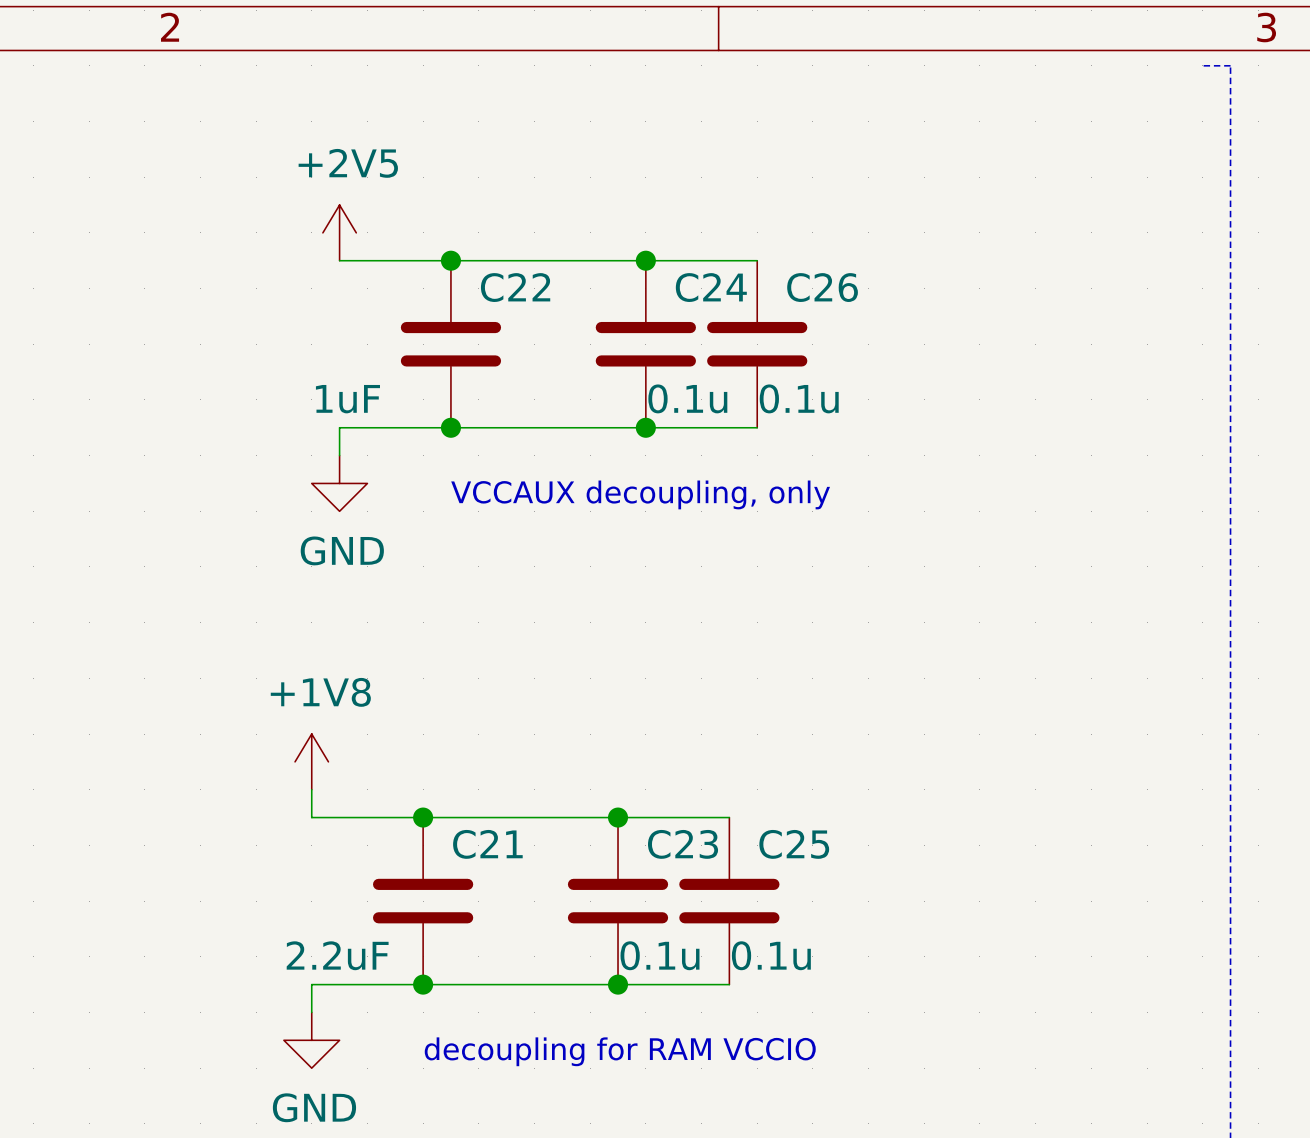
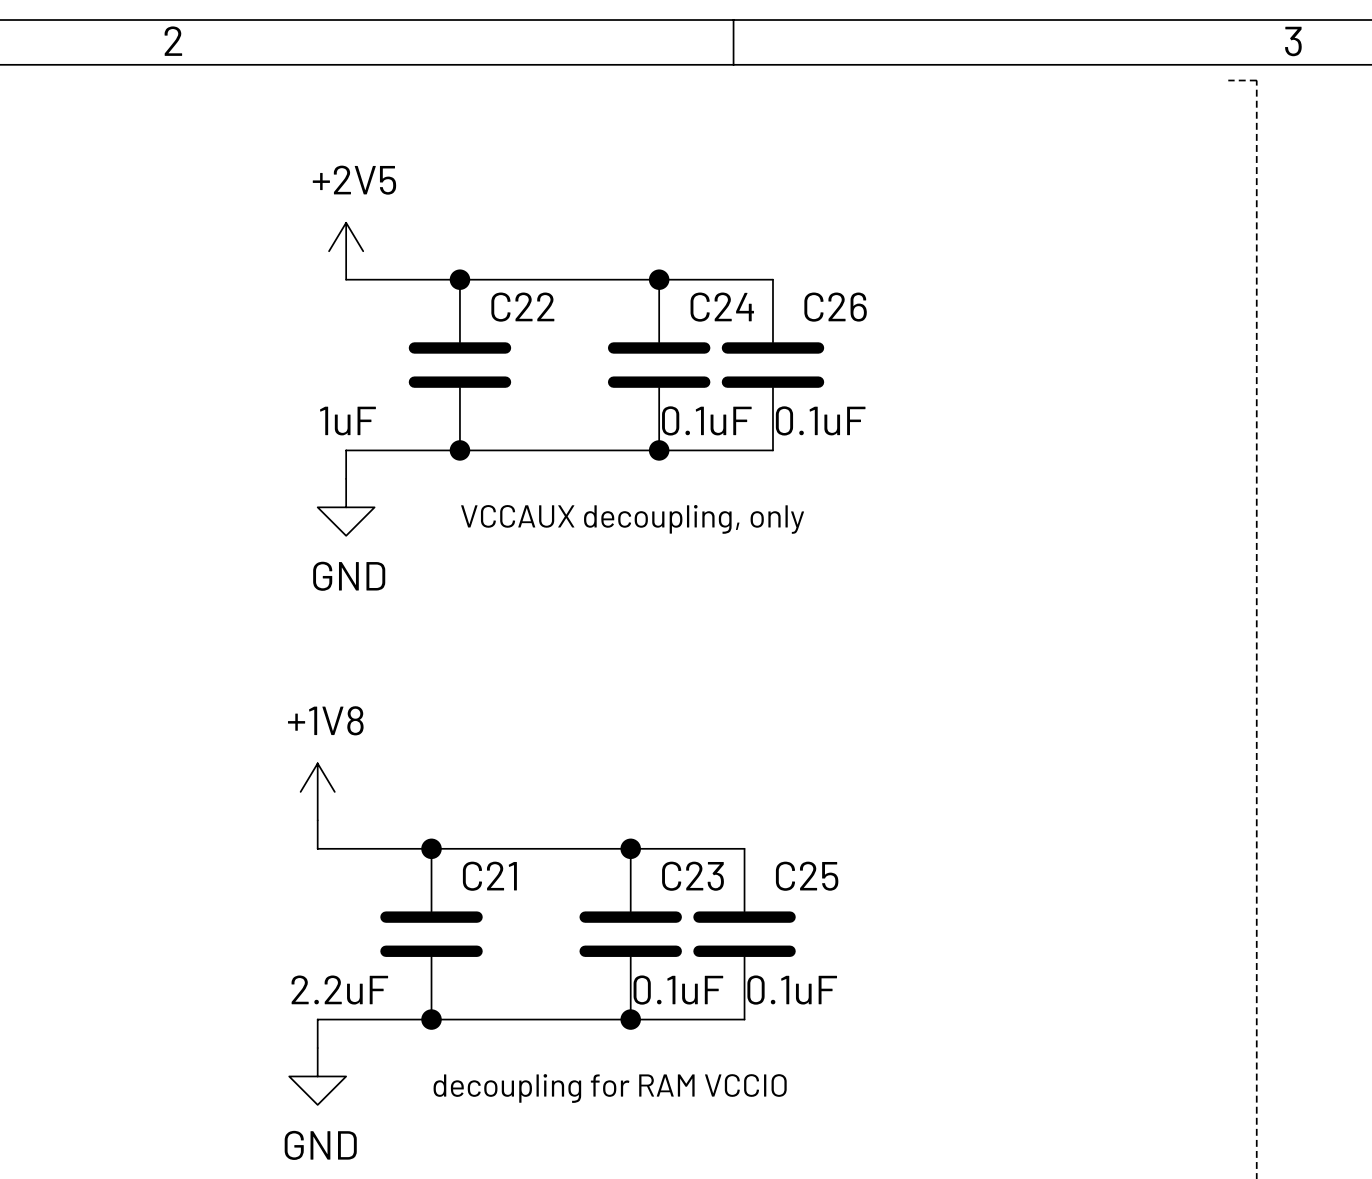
C24 value: 0.1u (687, 398) -> 0.1uF (706, 420)
C26 value: 0.1u (799, 398) -> 0.1uF (820, 420)
C23 value: 0.1u (660, 955) -> 0.1uF (678, 990)
C25 value: 0.1u (771, 955) -> 0.1uF (792, 990)

